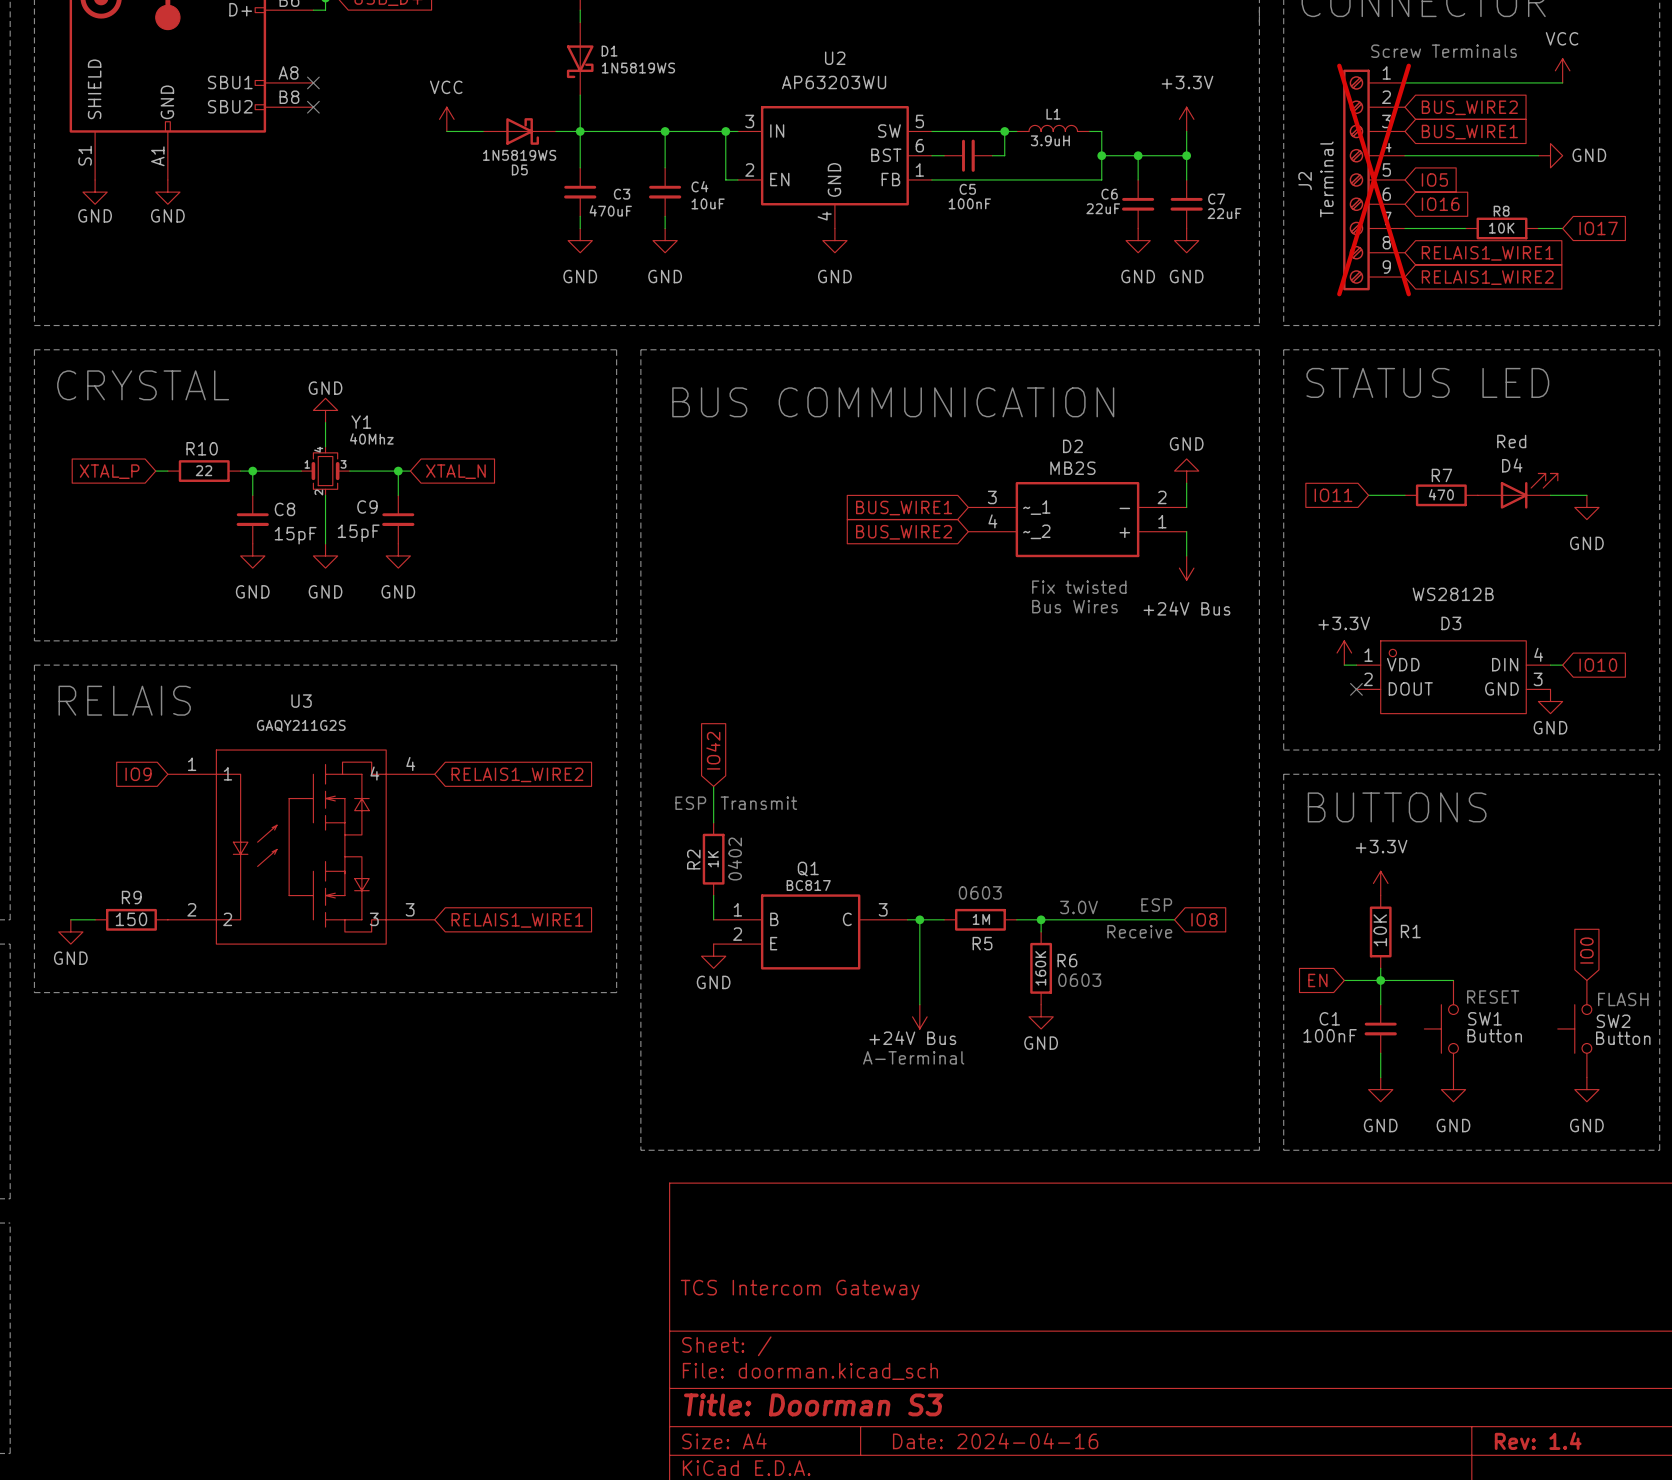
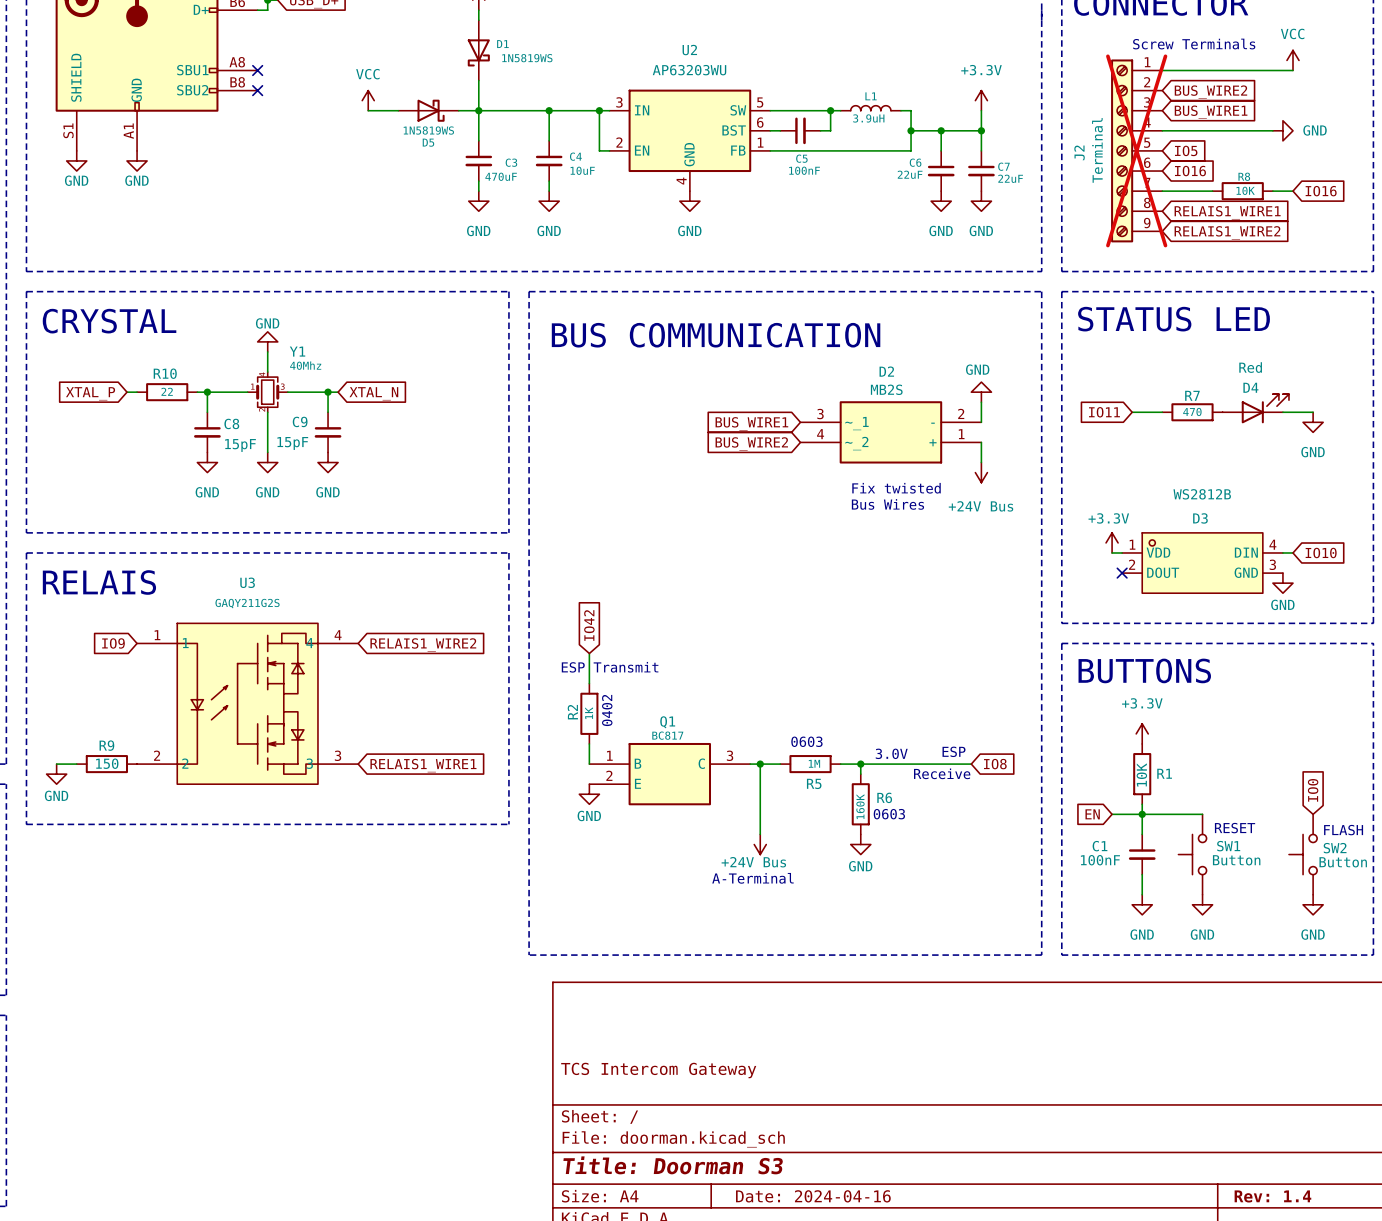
global label: IO17 (1598, 228) -> IO16 (1321, 191)

